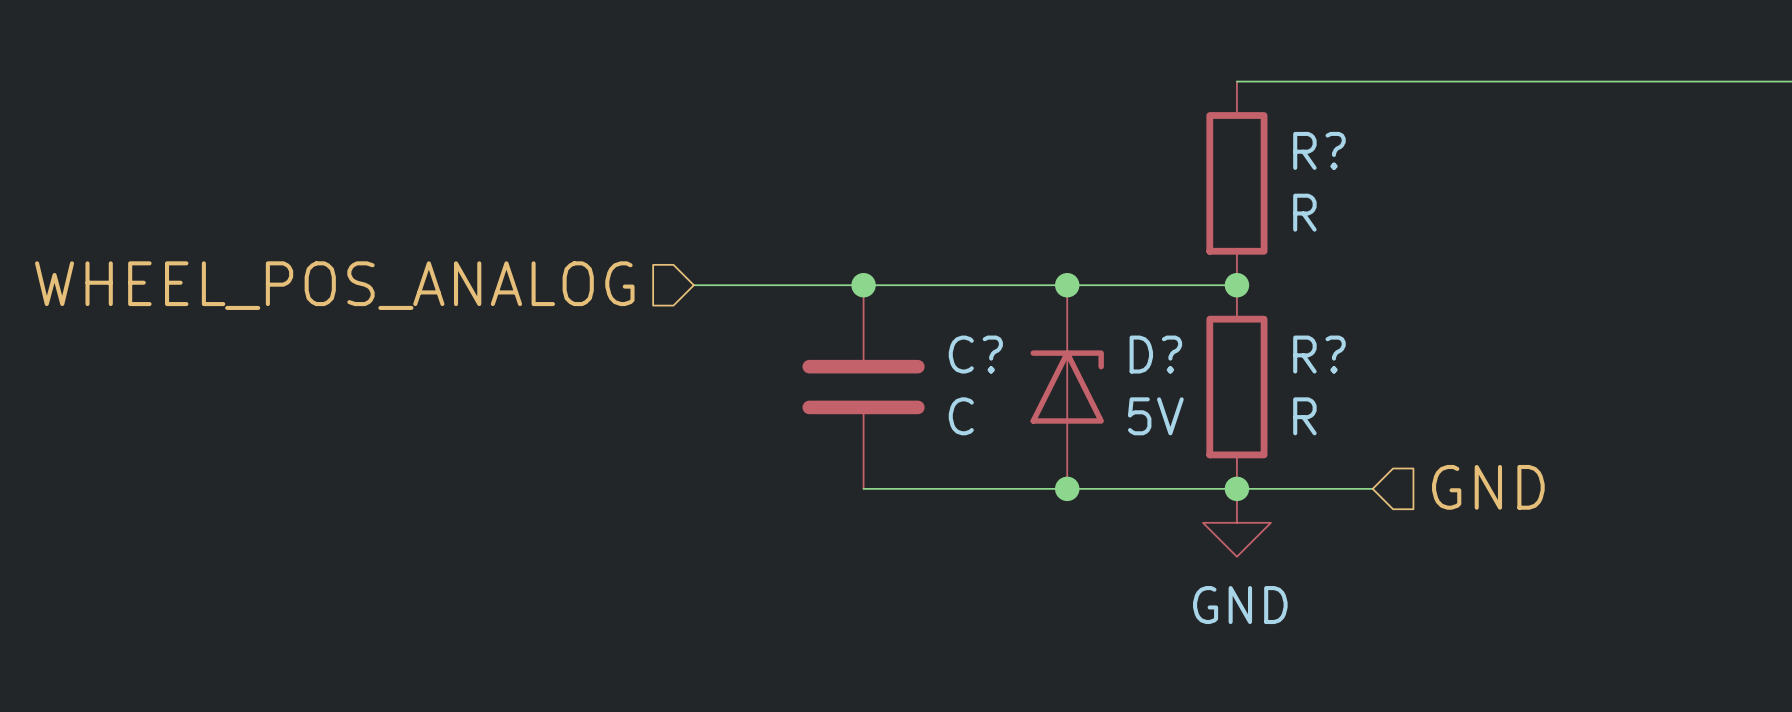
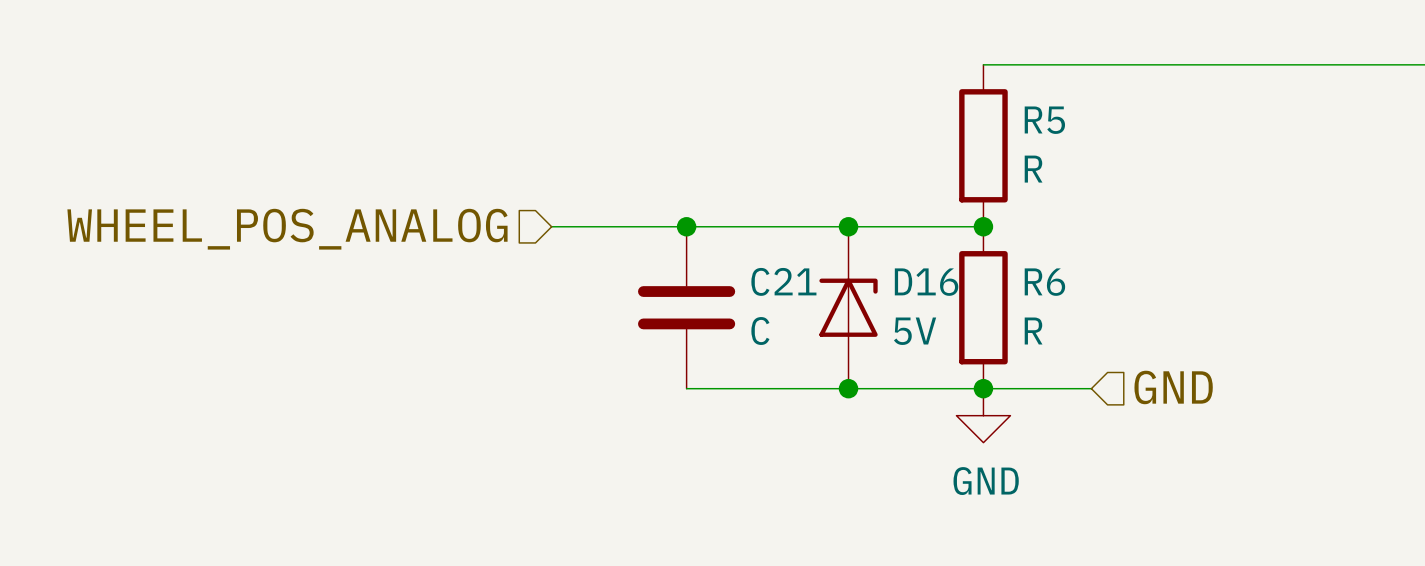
R? name: R? (1319, 150) -> R5 (1044, 120)
C? name: C? (975, 354) -> C21 (783, 281)
D? name: D? (1155, 354) -> D16 (926, 282)
R? name: R? (1319, 354) -> R6 (1044, 282)

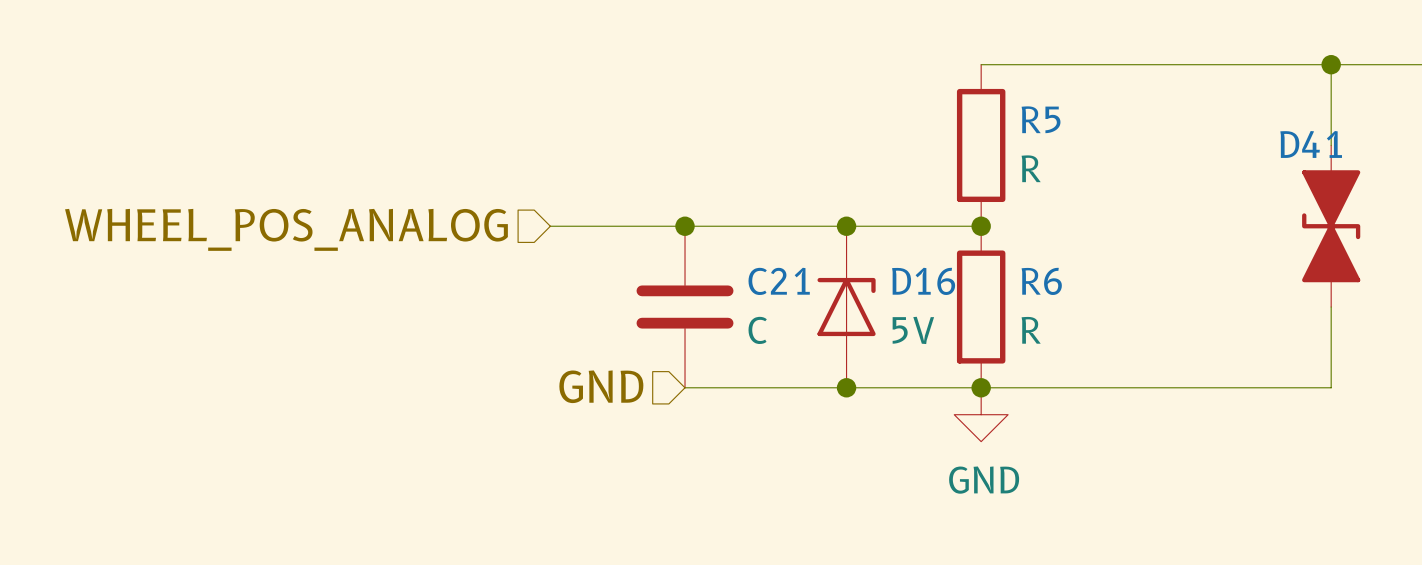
wire: none -> (1331, 64) (1331, 145)
junction: none -> (1331, 64)
D41: none -> (1331, 226)
wire: none -> (1331, 307) (1331, 387) (1088, 387)
hierarchical label rotation: 0° (1173, 387) -> 180° (601, 386)
hierarchical label position: GND (1173, 387) -> GND (601, 386)

